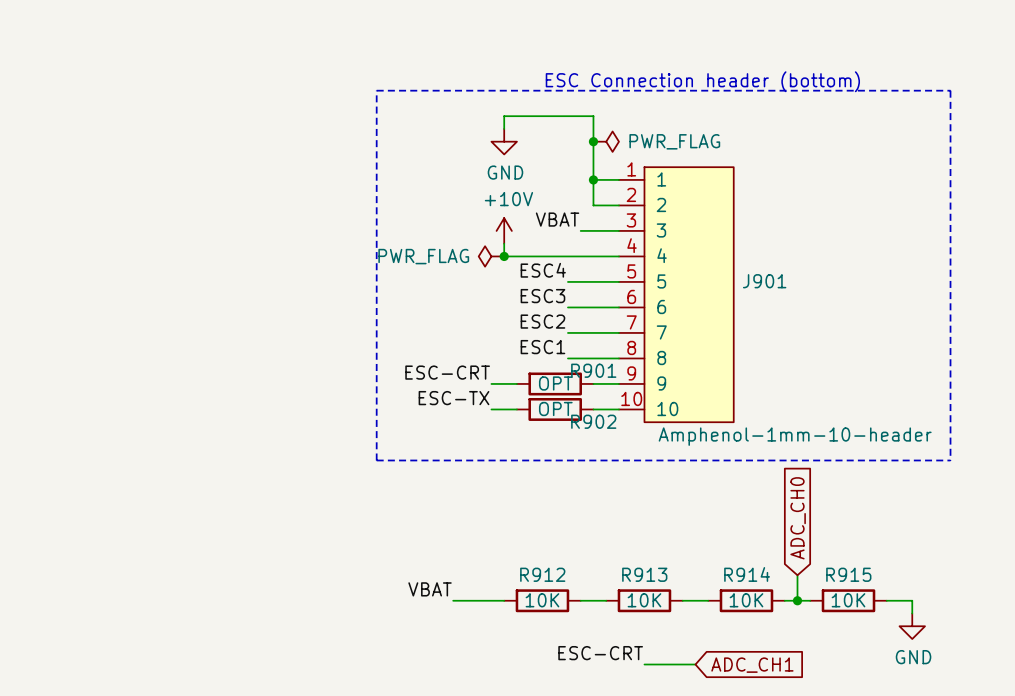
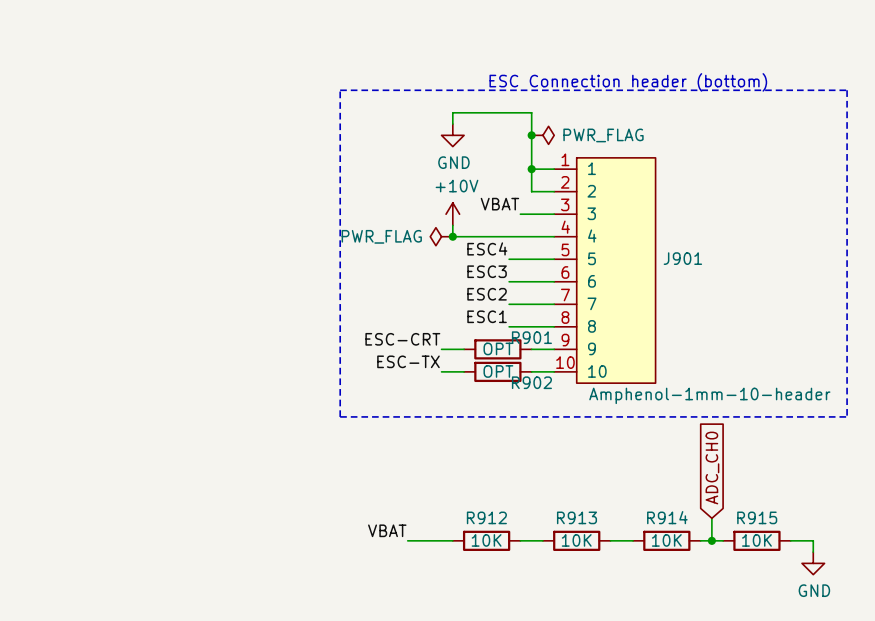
label: ESC-CRT (600, 653) -> none
wire: (644, 664) (695, 664) -> none
global label: ADC_CH1 (752, 665) -> none

